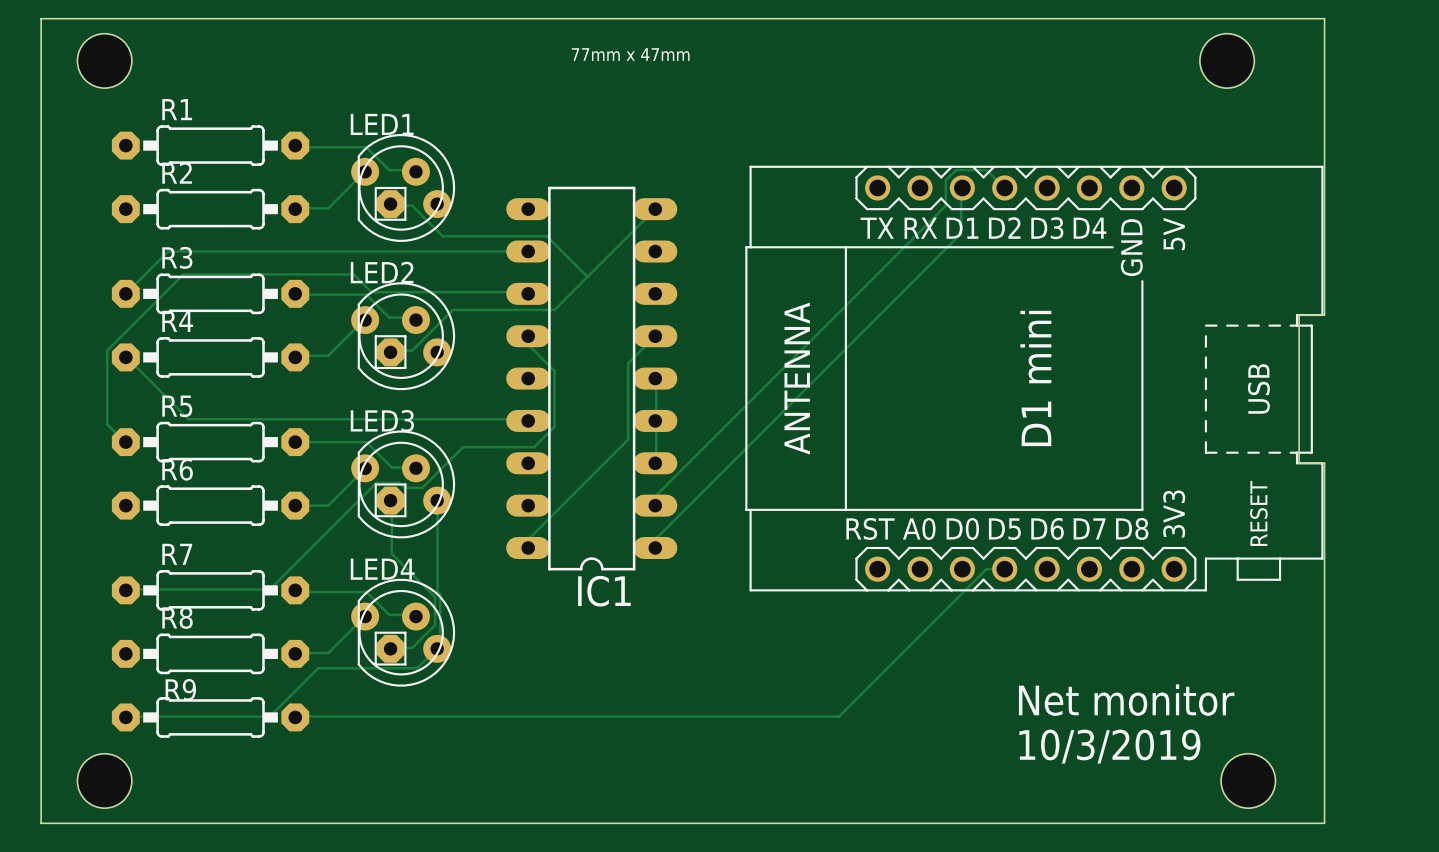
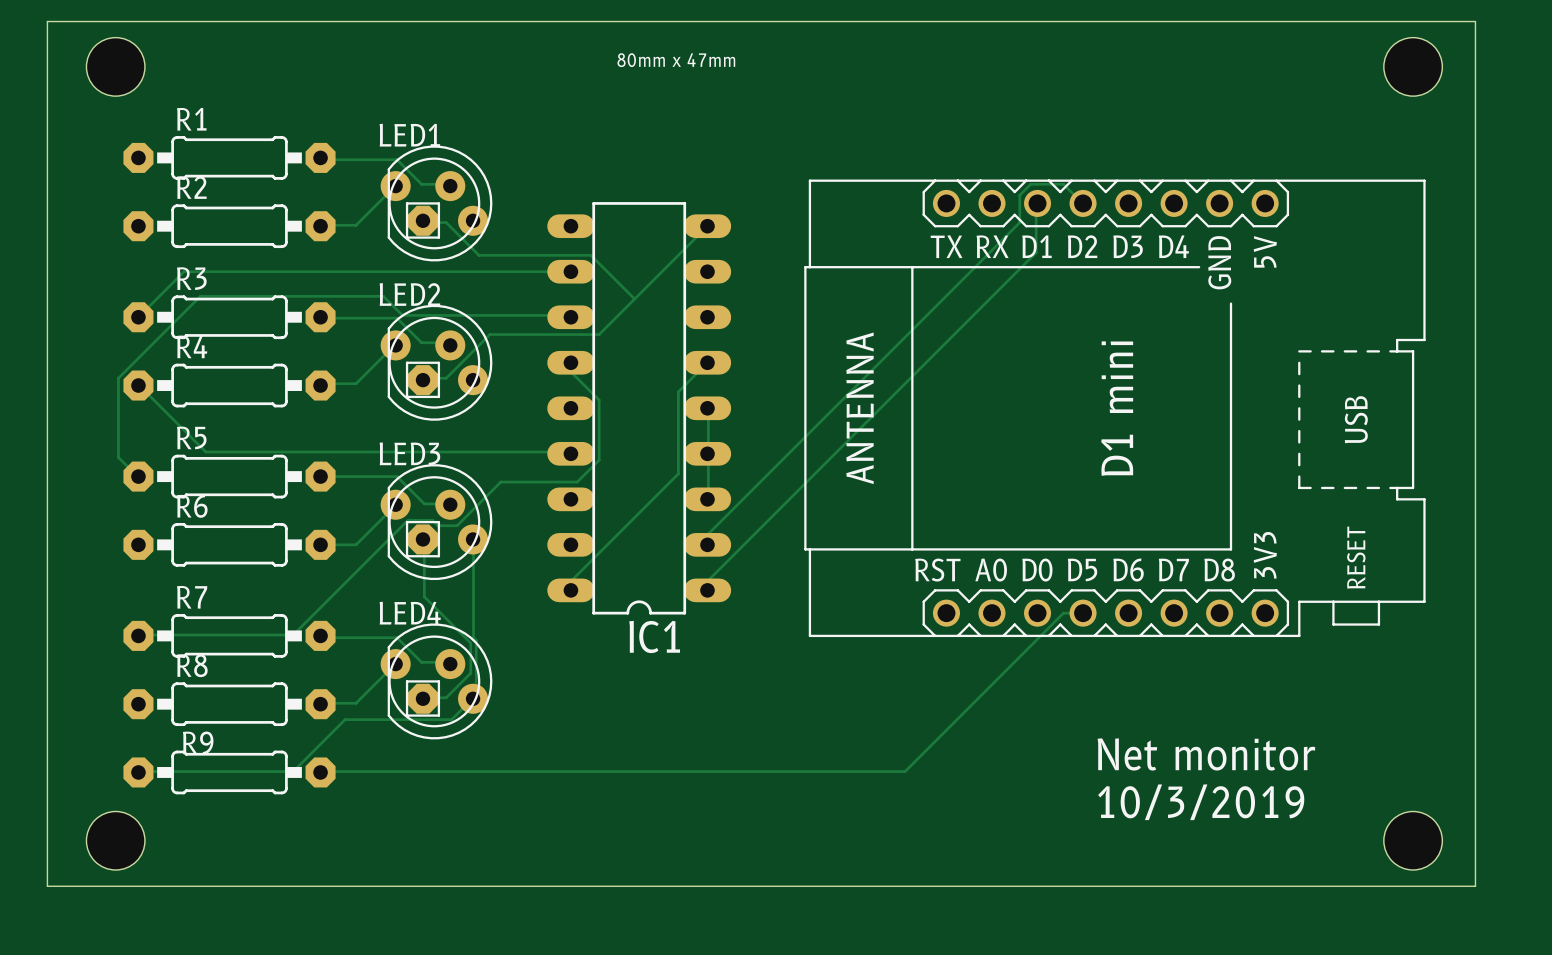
board edge: (1324, 18) (1324, 315) (1299, 315) (1299, 463) (1324, 463) (1324, 823) -> (1426, 21) (1475, 21) (1475, 886) (1426, 886)
text: 77mm x 47mm (630, 54) -> 80mm x 47mm (676, 60)
hole position: (1227, 60) -> (1413, 66)
hole position: (1248, 780) -> (1413, 840)

